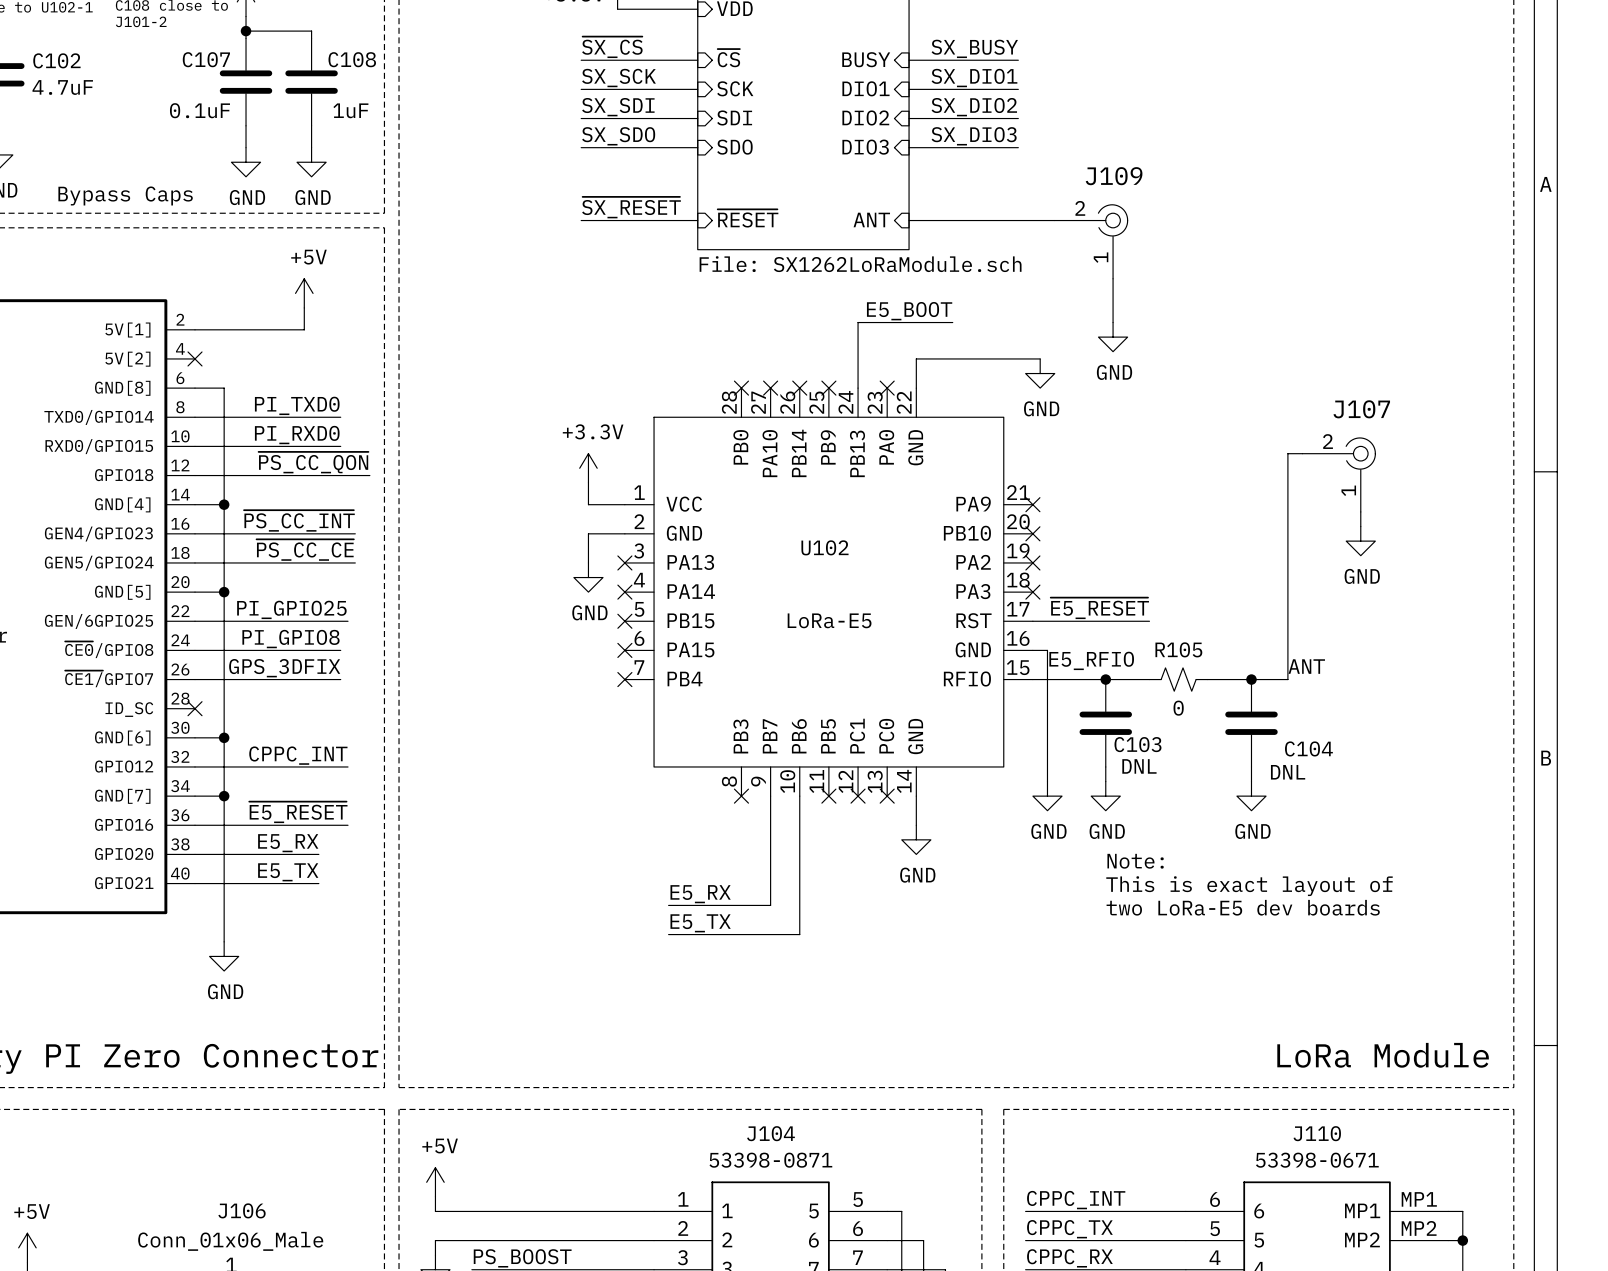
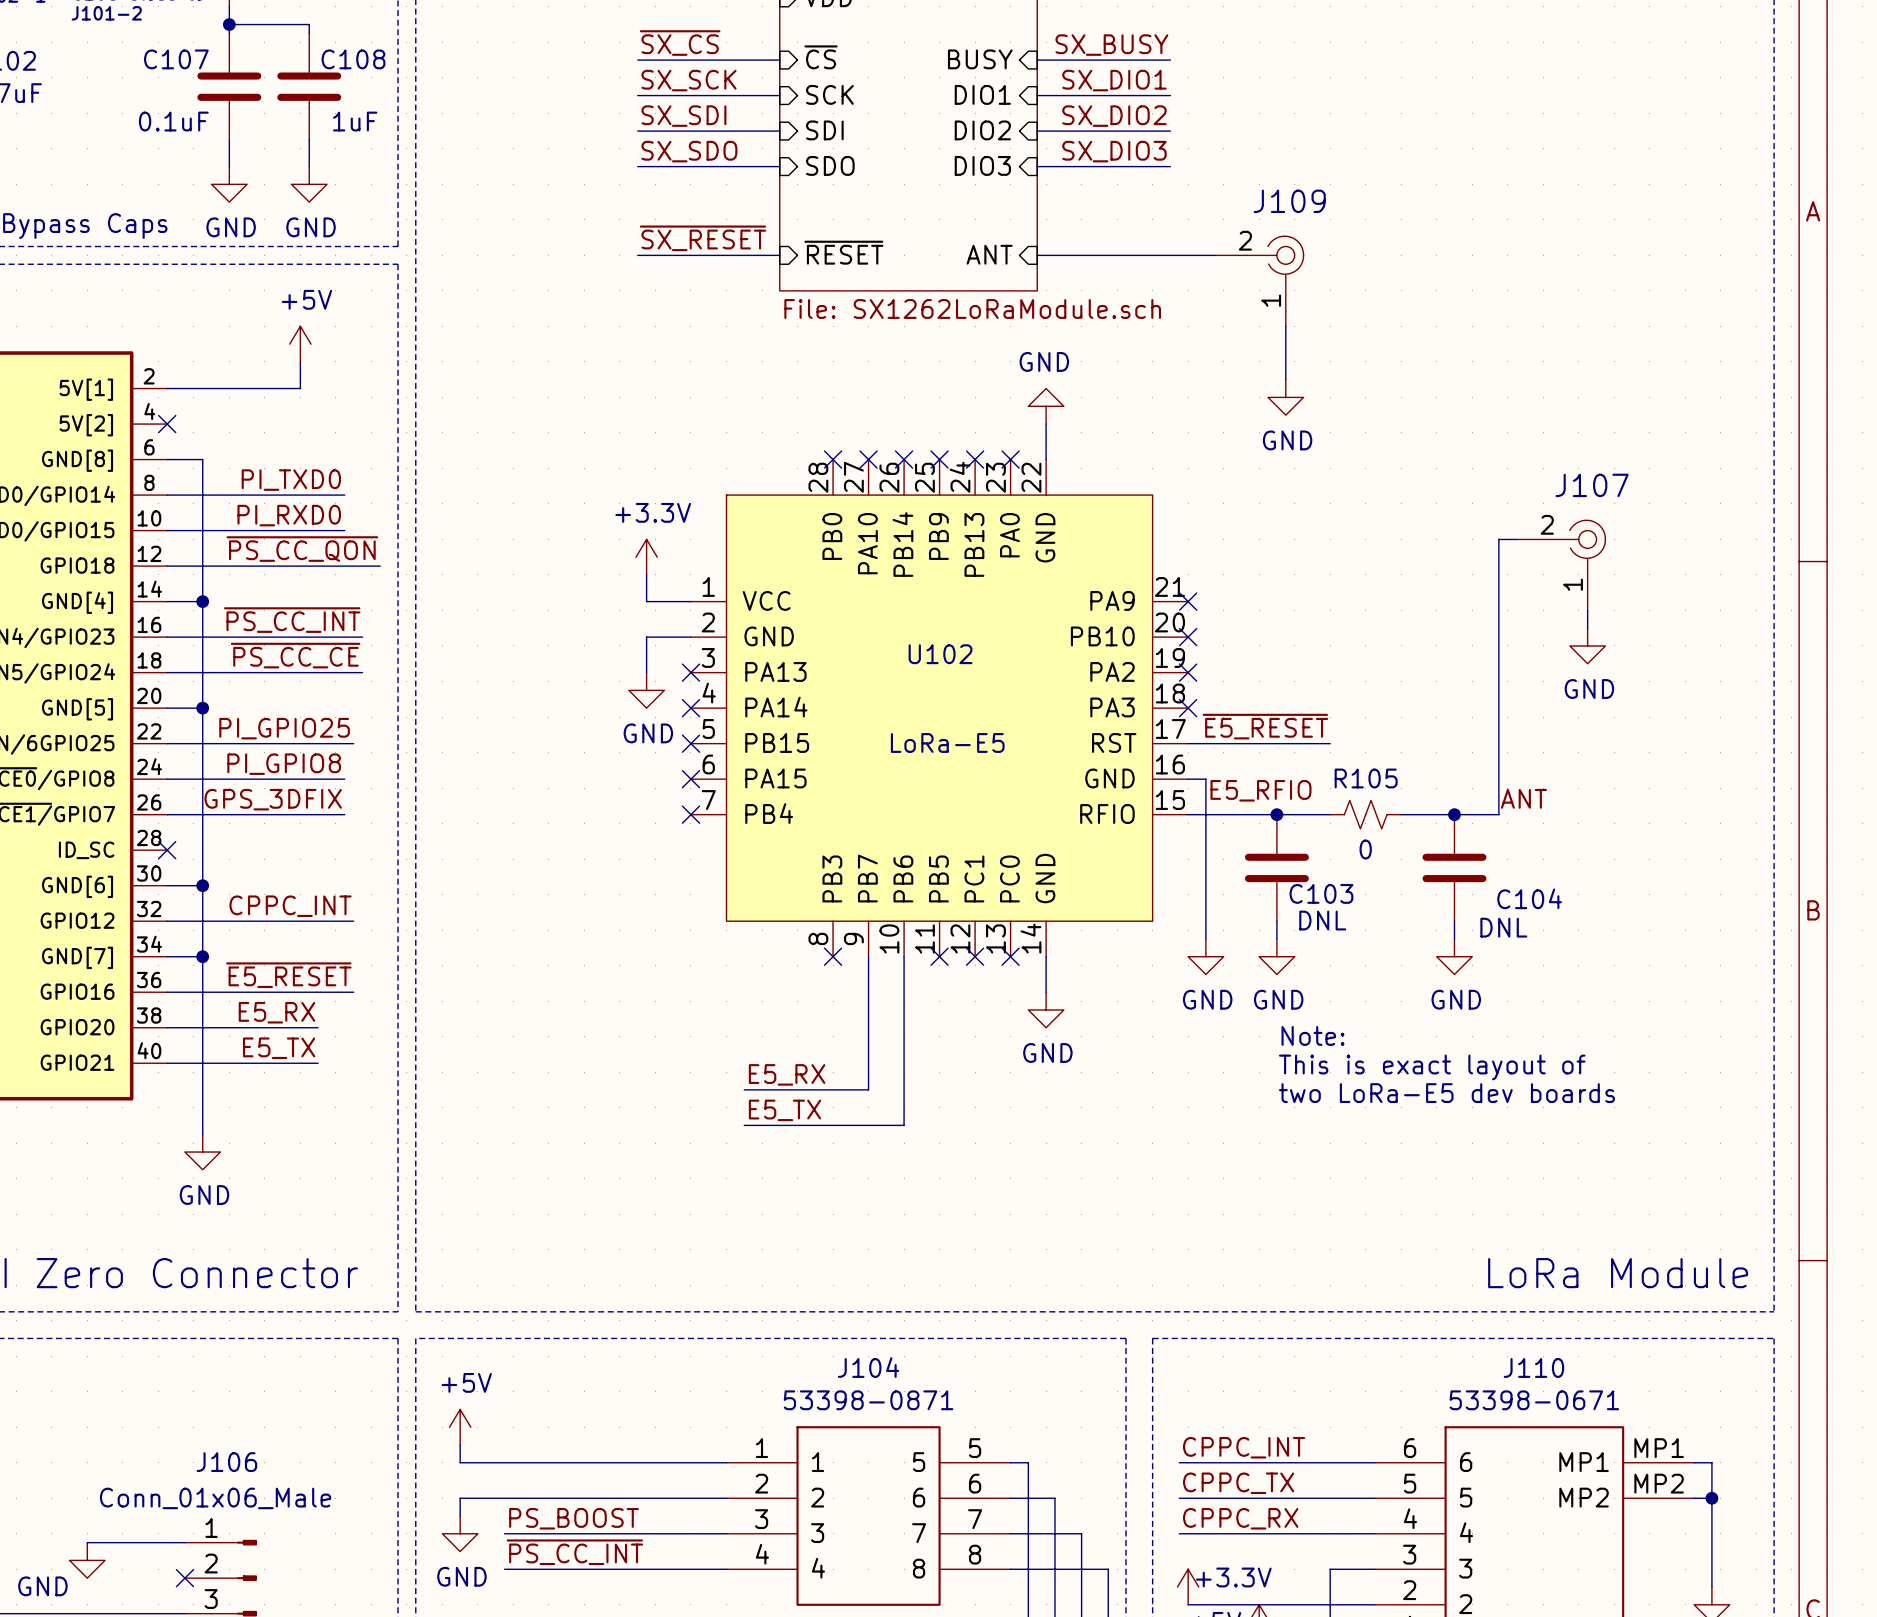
label: E5_BOOT (909, 311) -> none
wire: (952, 322) (858, 322) (858, 388) -> none
wire: (916, 358) (1040, 358) -> none
power symbol rotation: 0° (1040, 373) -> 180° (1046, 406)
power symbol position: GND (1040, 373) -> GND (1046, 406)
no-connect mark: none -> (975, 459)

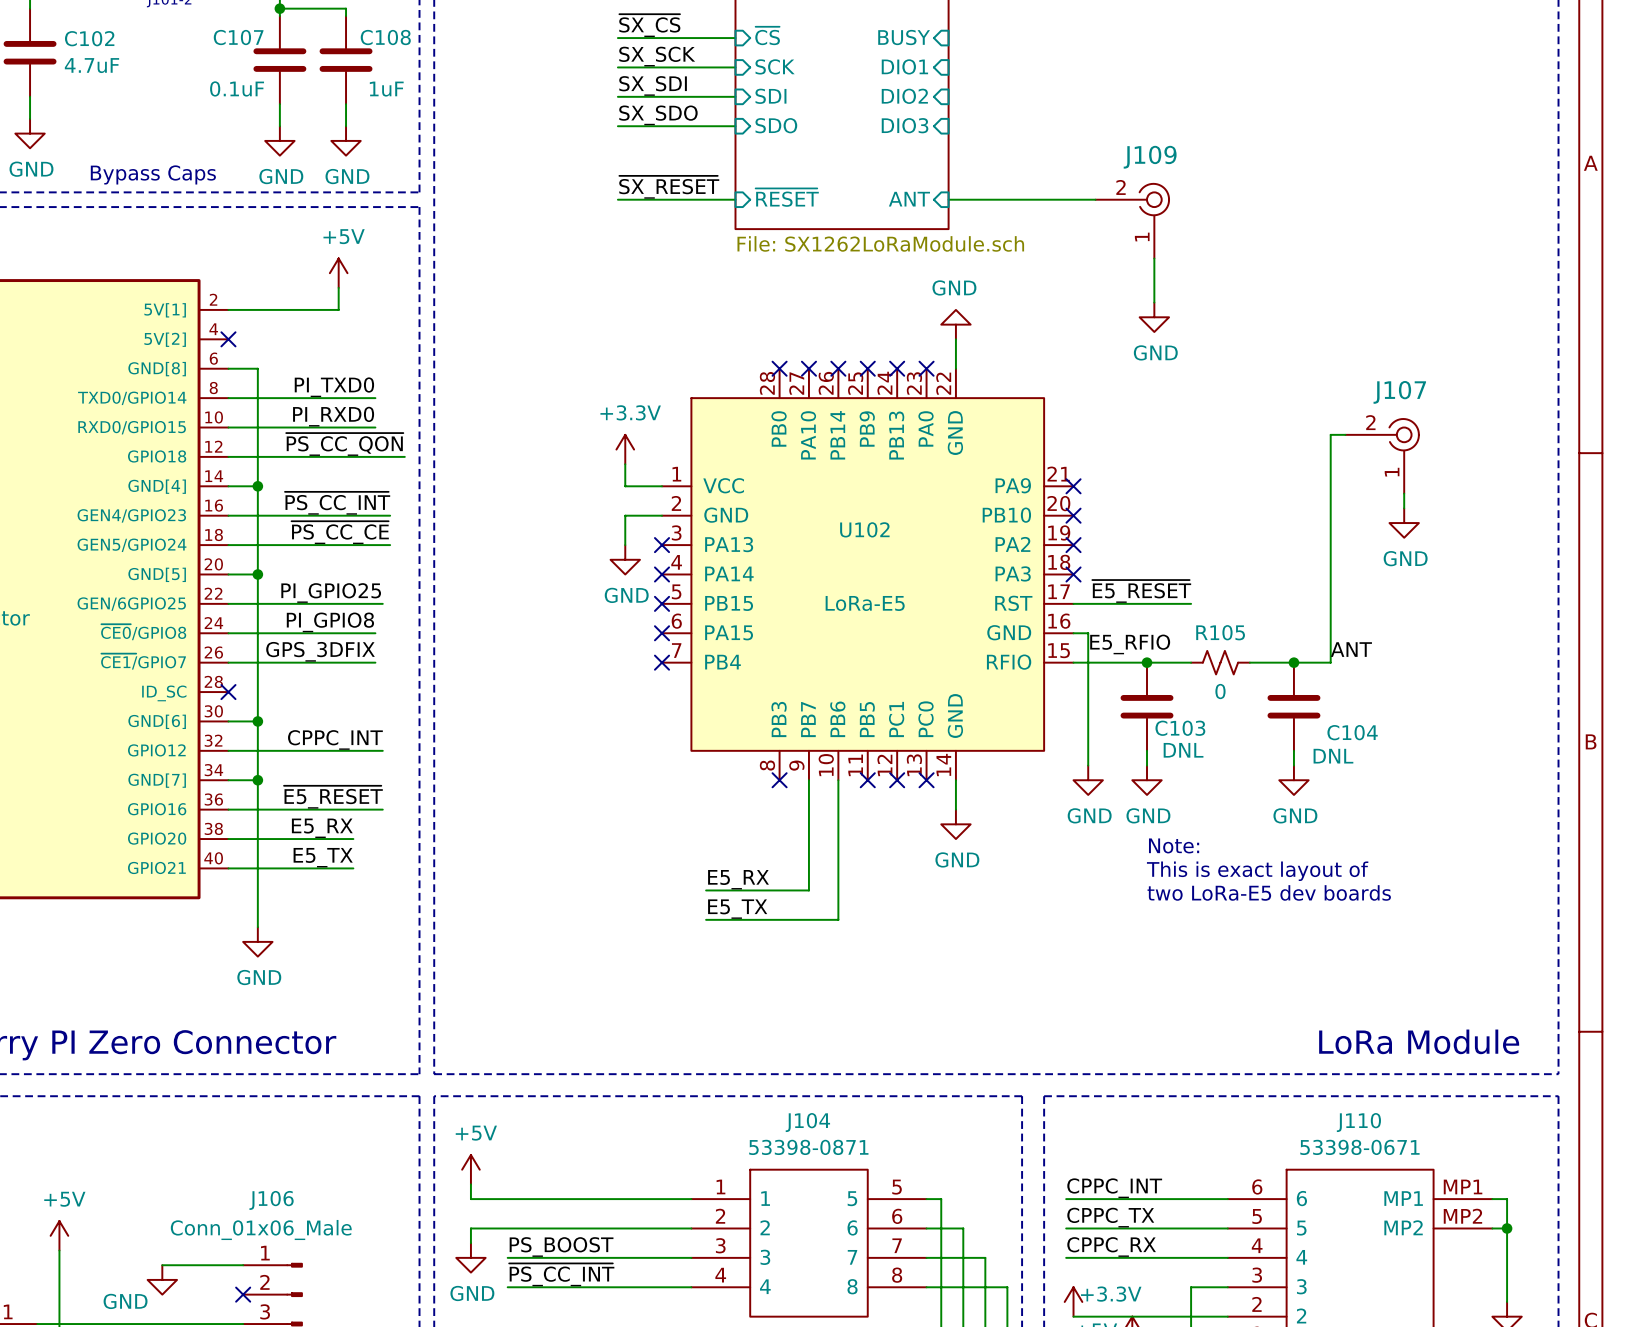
label: SX_BUSY (1111, 45) -> none
wire: (1037, 60) (1170, 60) -> none
label: SX_DIO1 (1114, 80) -> none
wire: (1037, 95) (1170, 95) -> none
label: SX_DIO2 (1114, 116) -> none
wire: (1037, 131) (1170, 131) -> none
label: SX_DIO3 (1114, 151) -> none
wire: (1037, 166) (1170, 166) -> none

